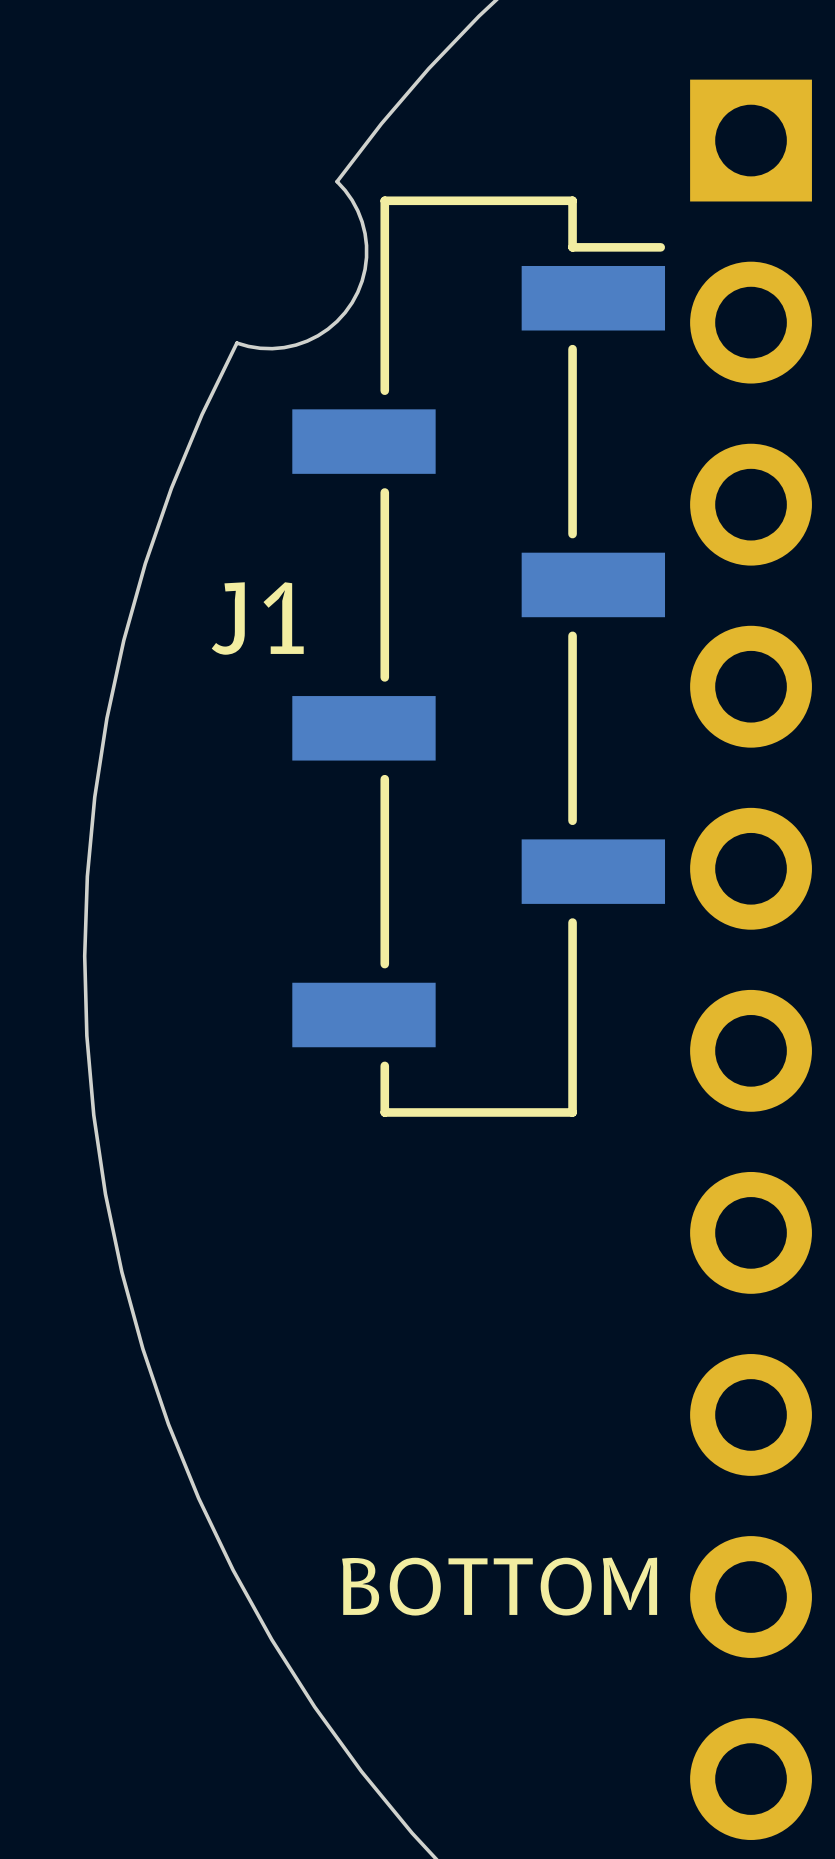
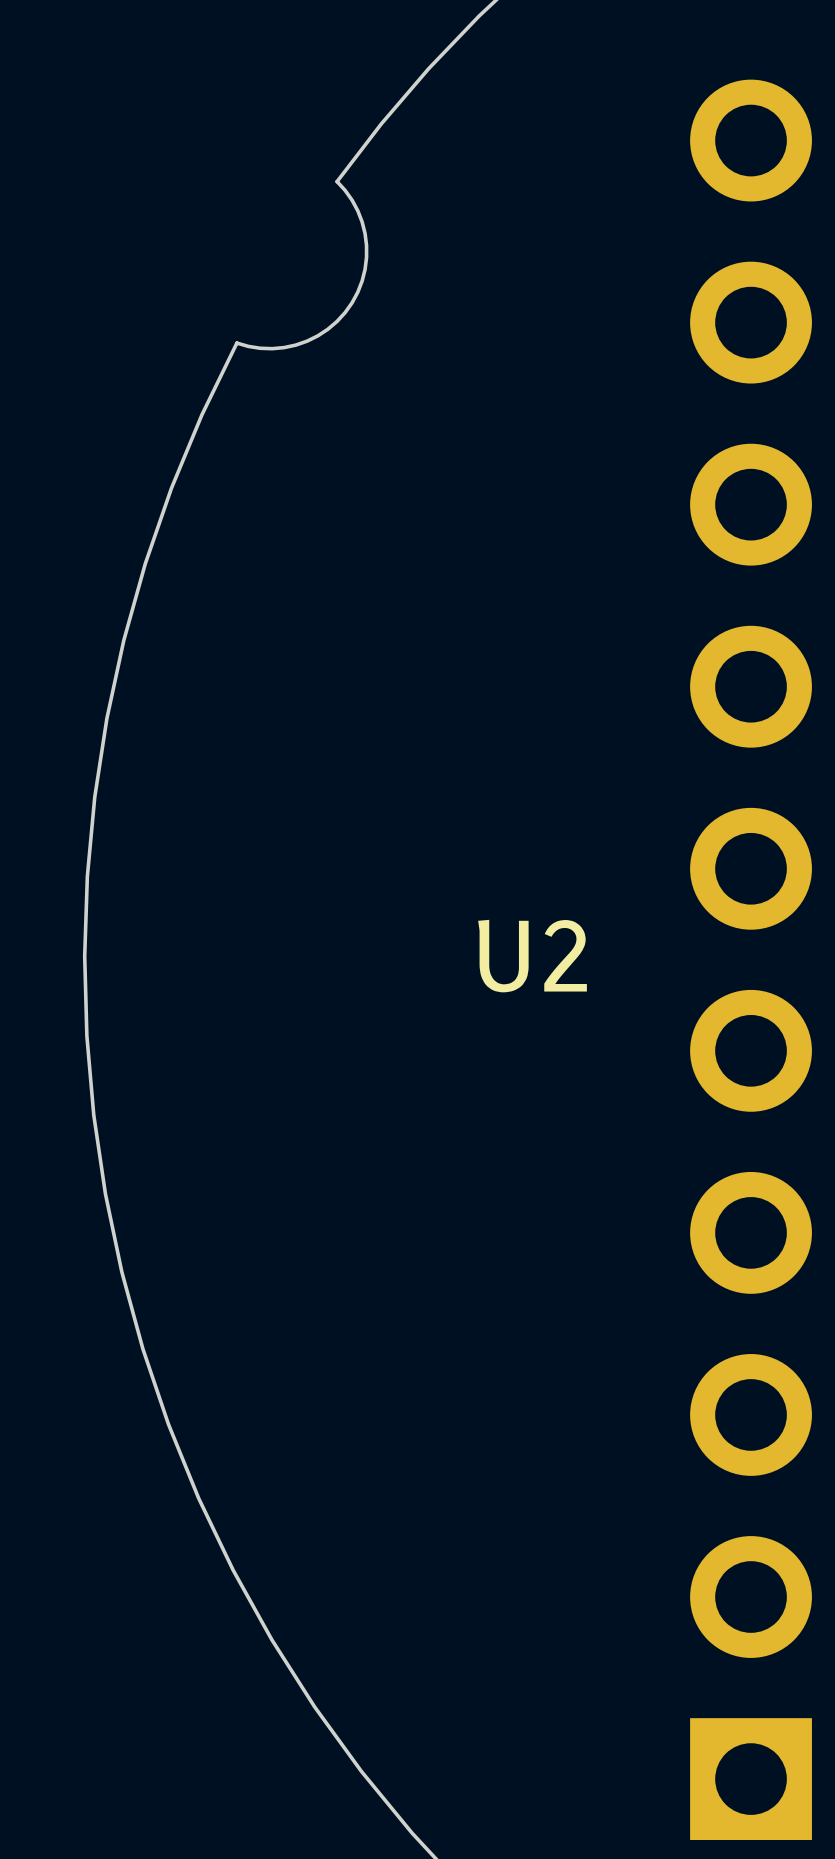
J1: (478, 656) -> none
U2 side: top (751, 959) -> bottom (751, 959)
text: BOTTOM (499, 1586) -> none

